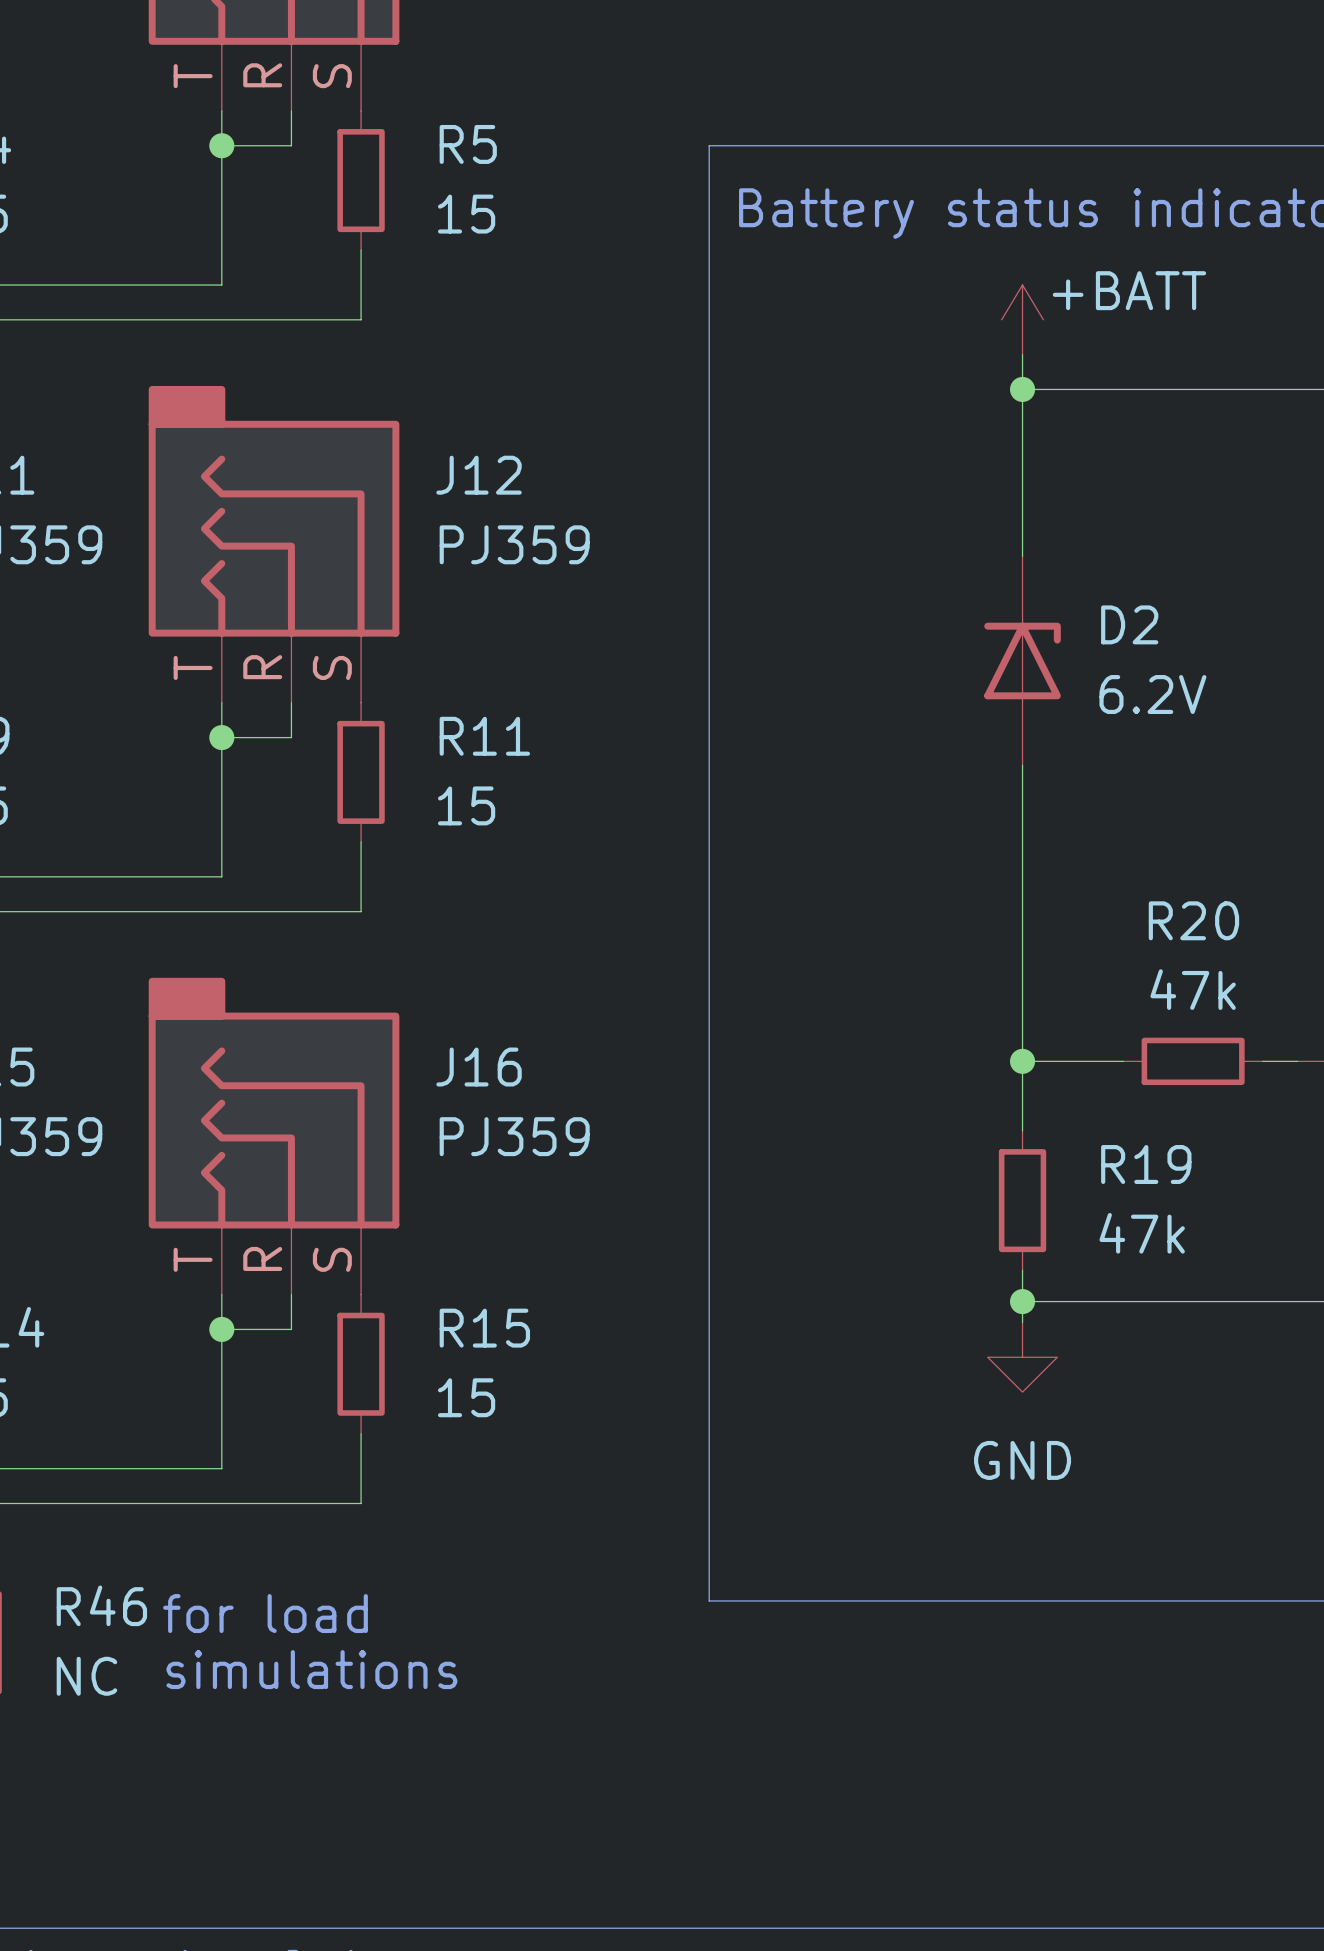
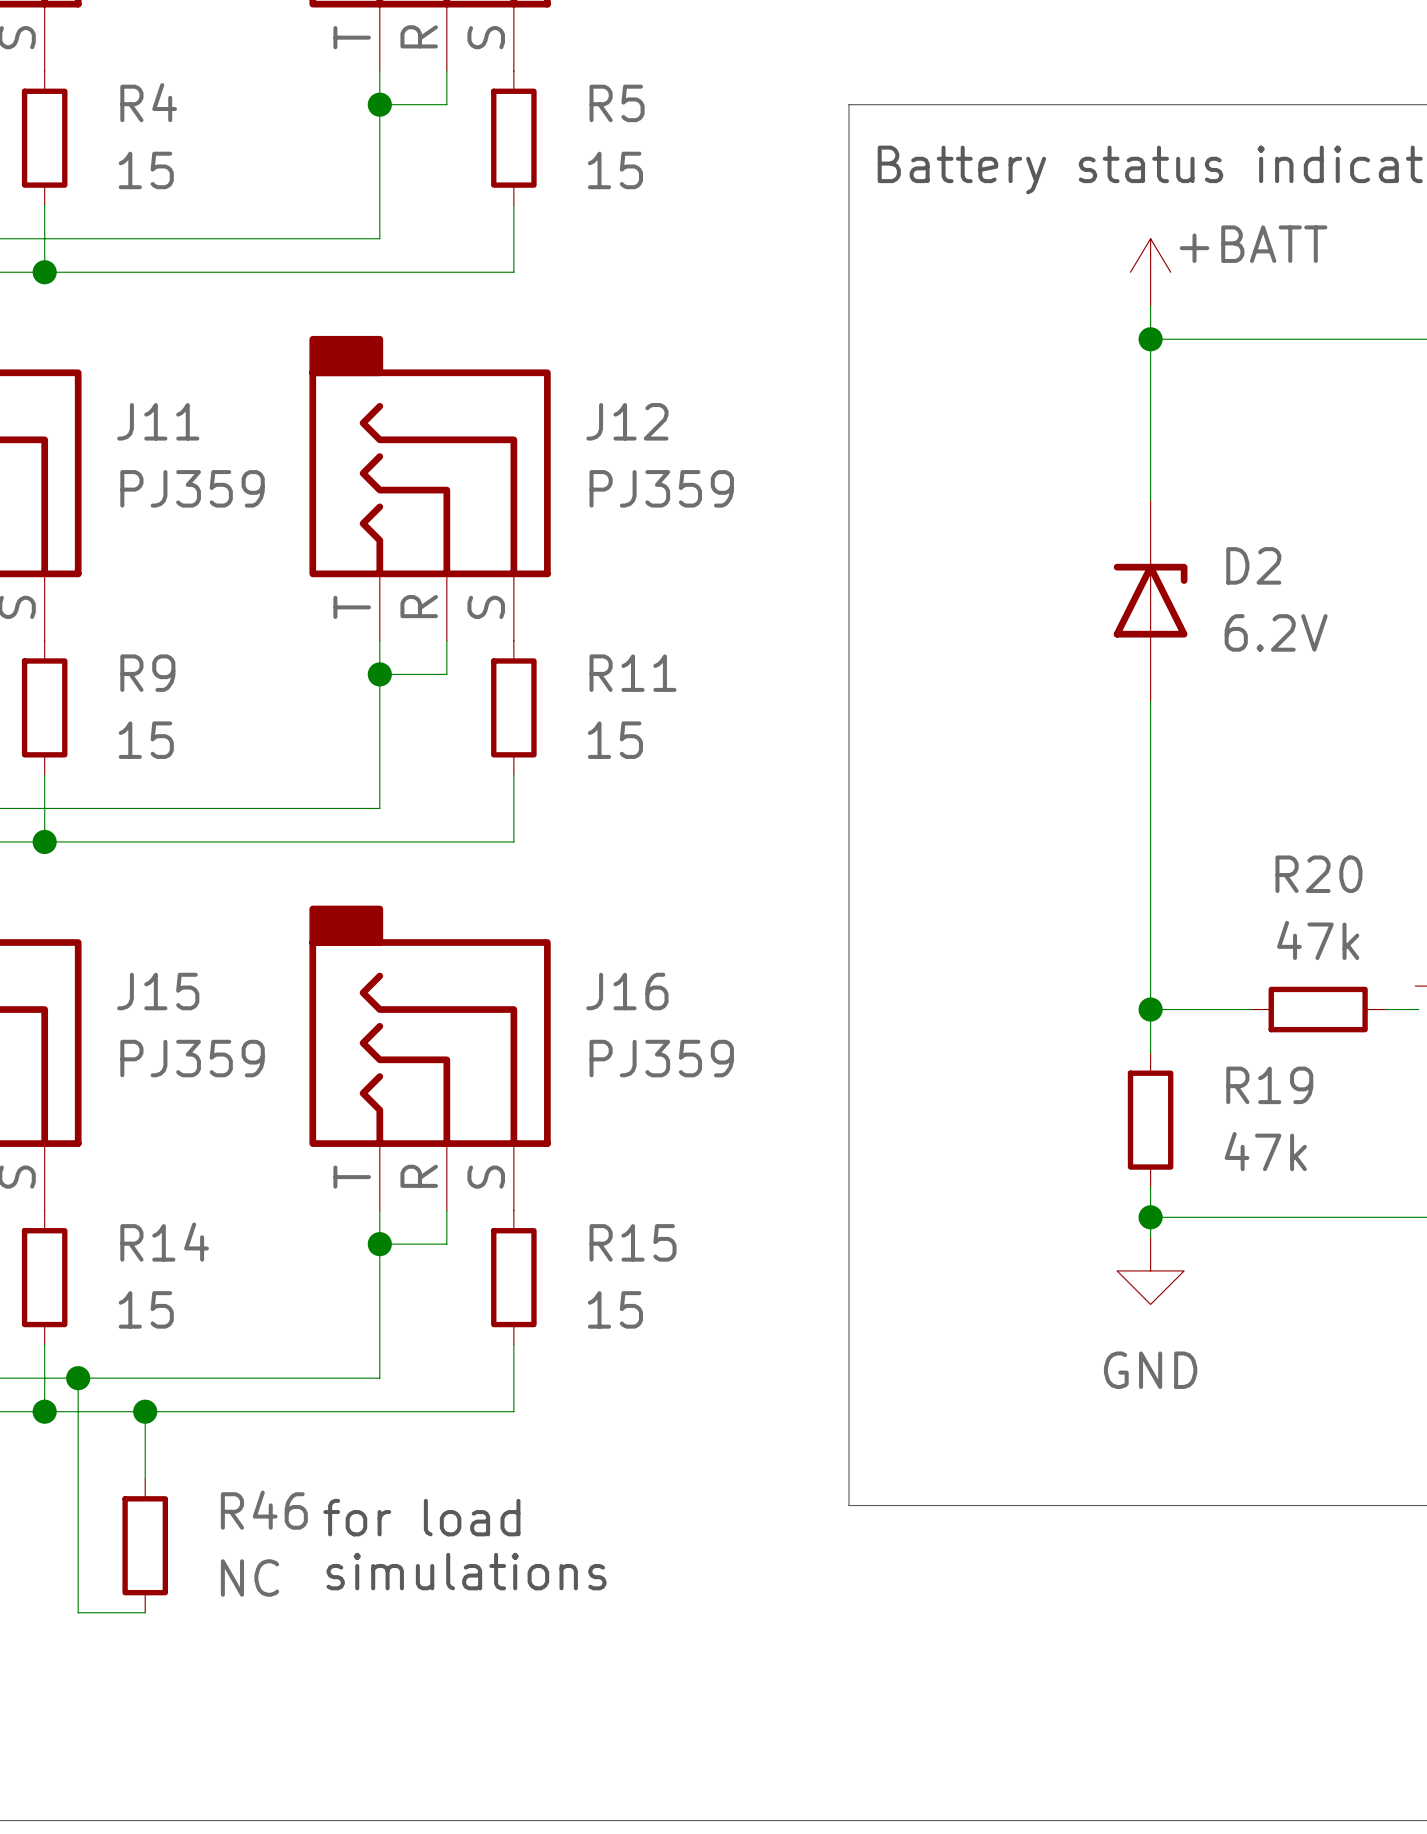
wire: (1022, 1061) (1123, 1061) -> none
junction position: (1022, 1061) -> (1150, 1009)
R20 position: (1193, 1061) -> (1318, 1009)
wire: (1262, 1061) (1297, 1061) -> (1385, 1009) (1418, 1009)
wire: none -> (1150, 1009) (1251, 1009)

